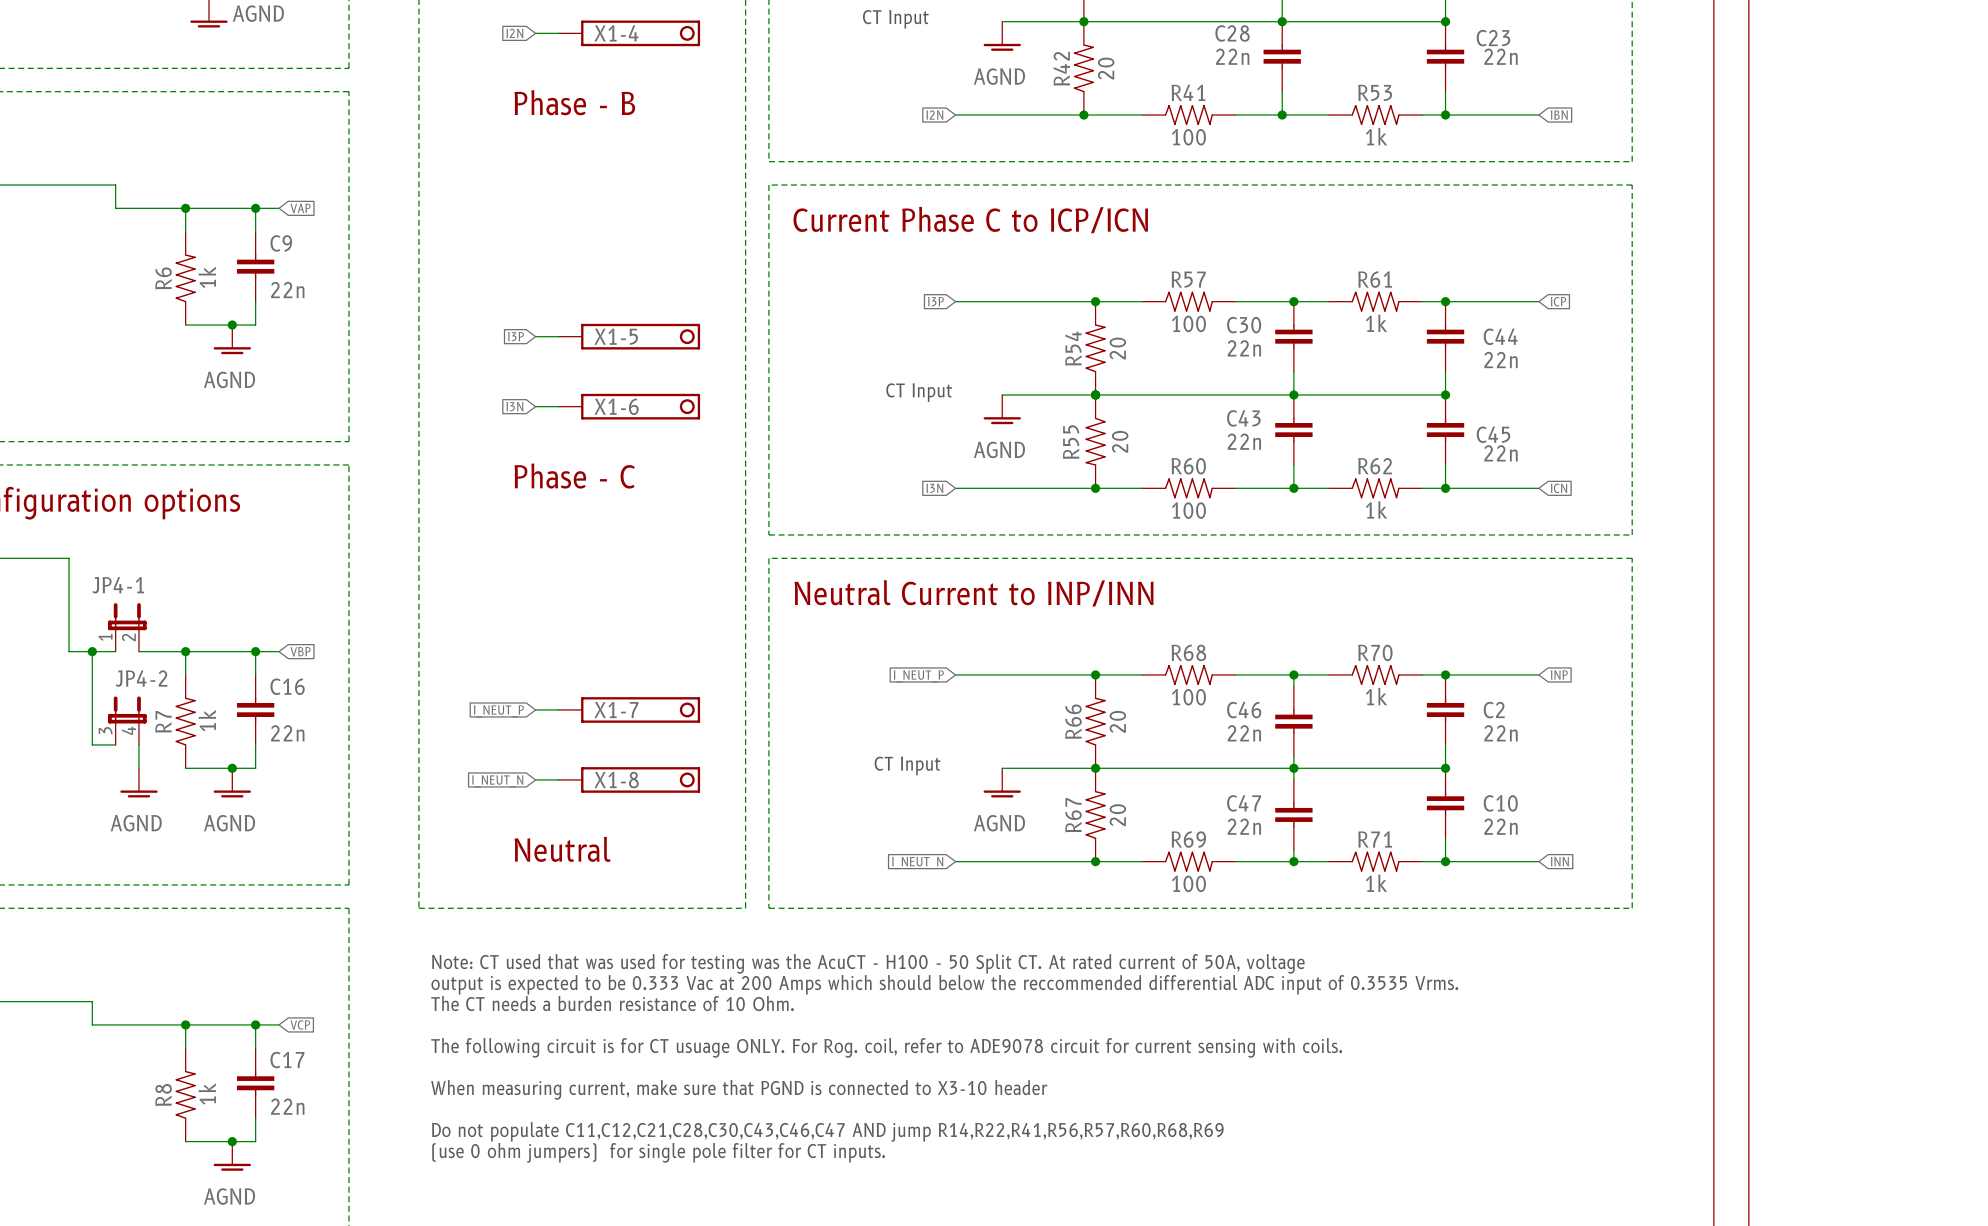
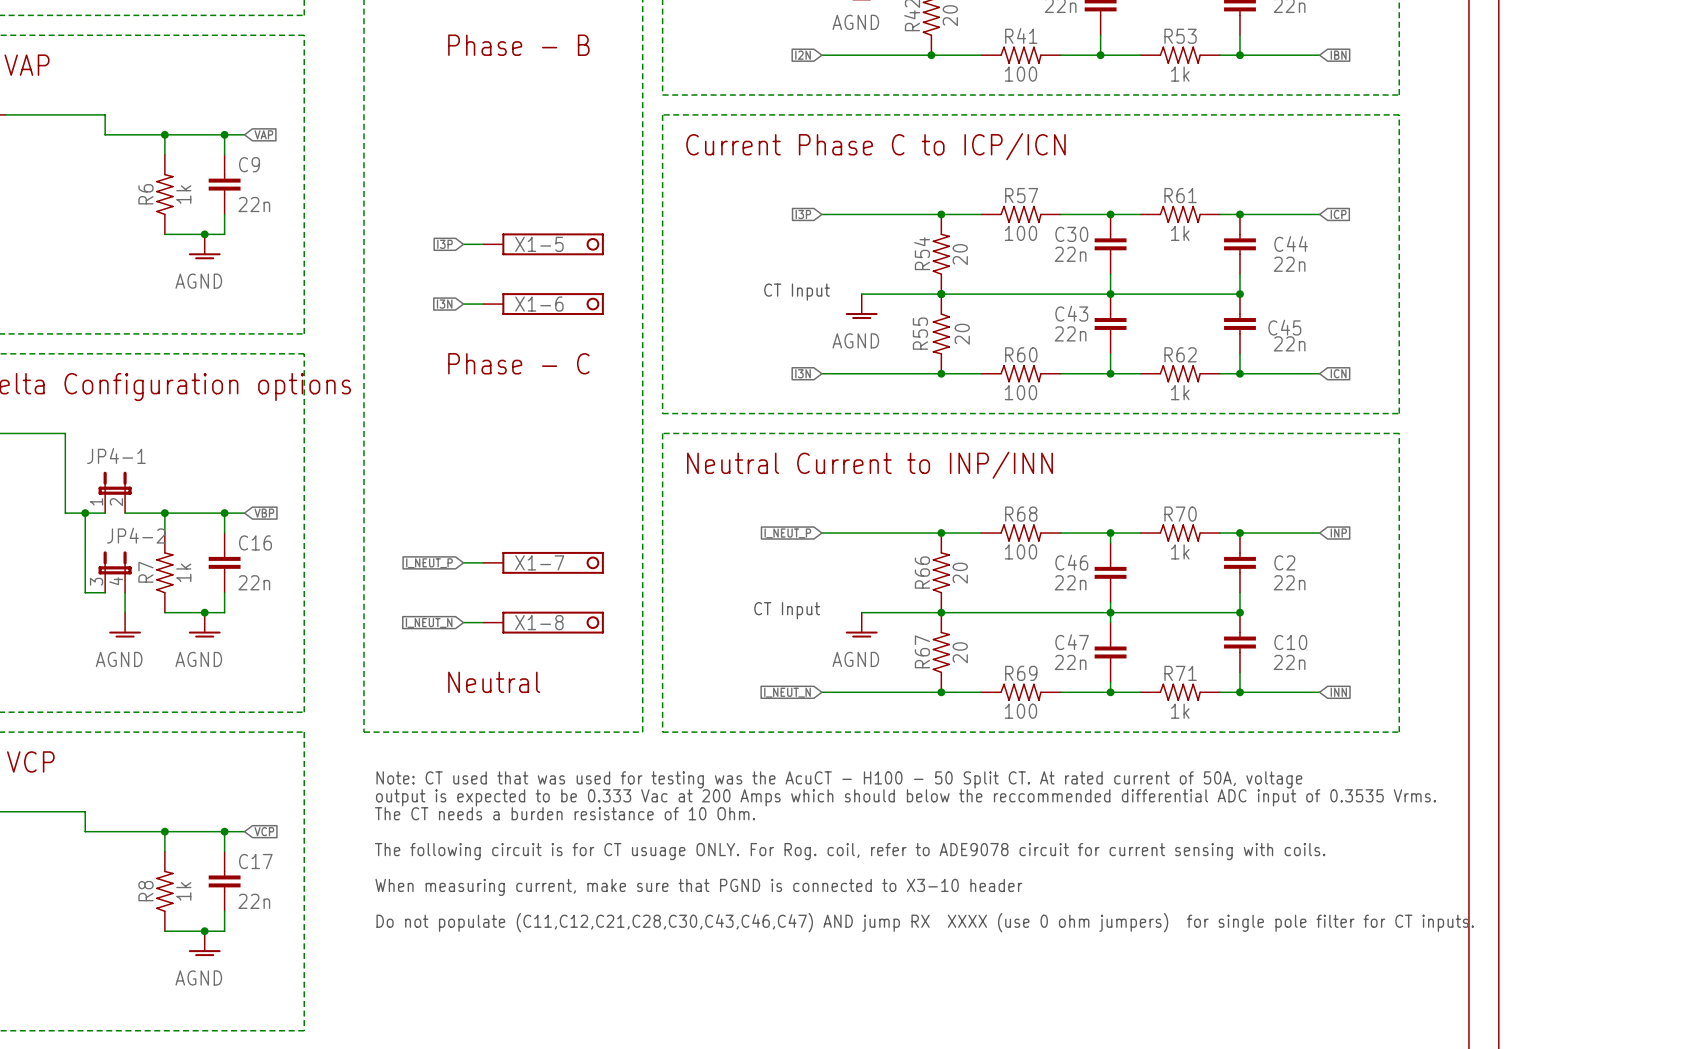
text: Do not populate C11,C12,C21,C28,C30,C43,C46,C47 AND jump R14,R22,R41,R56,R57,R60,R68,R69 (827, 1131) -> Do not populate (C11,C12,C21,C28,C30,C43,C46,C47) AND jump RX XXXX (use 0 ohm jumpers) for single pole filter for CT inputs. (925, 922)
text: (use 0 ohm jumpers) for single pole filter for CT inputs. (658, 1152) -> none

